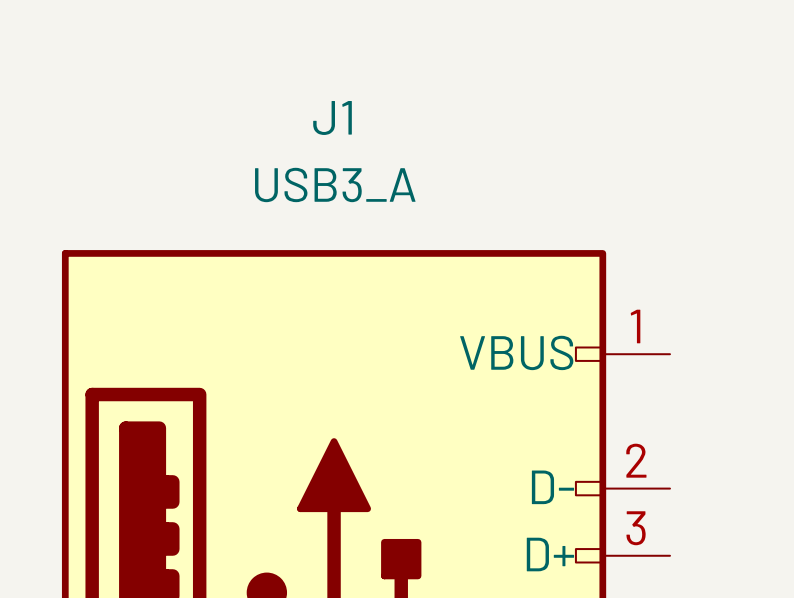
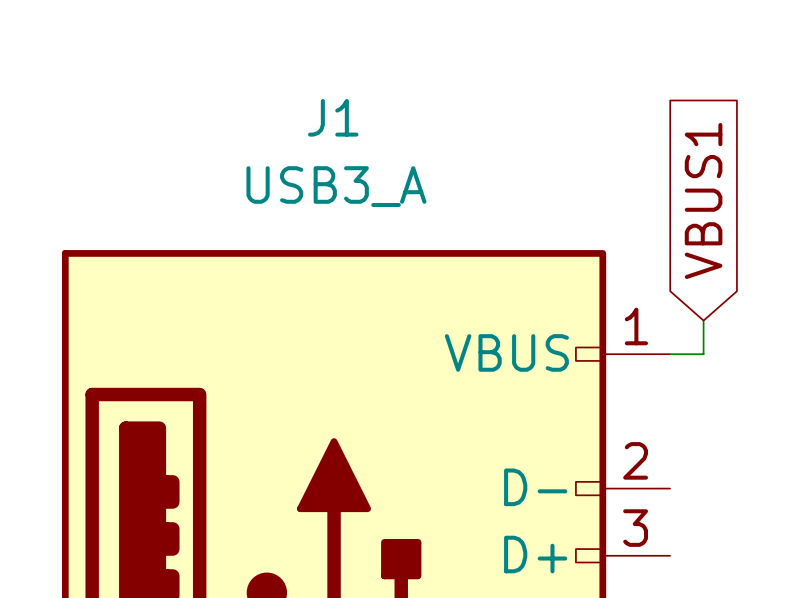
global label: none -> VBUS1 (703, 200)
wire: none -> (703, 320) (703, 354) (669, 354)

